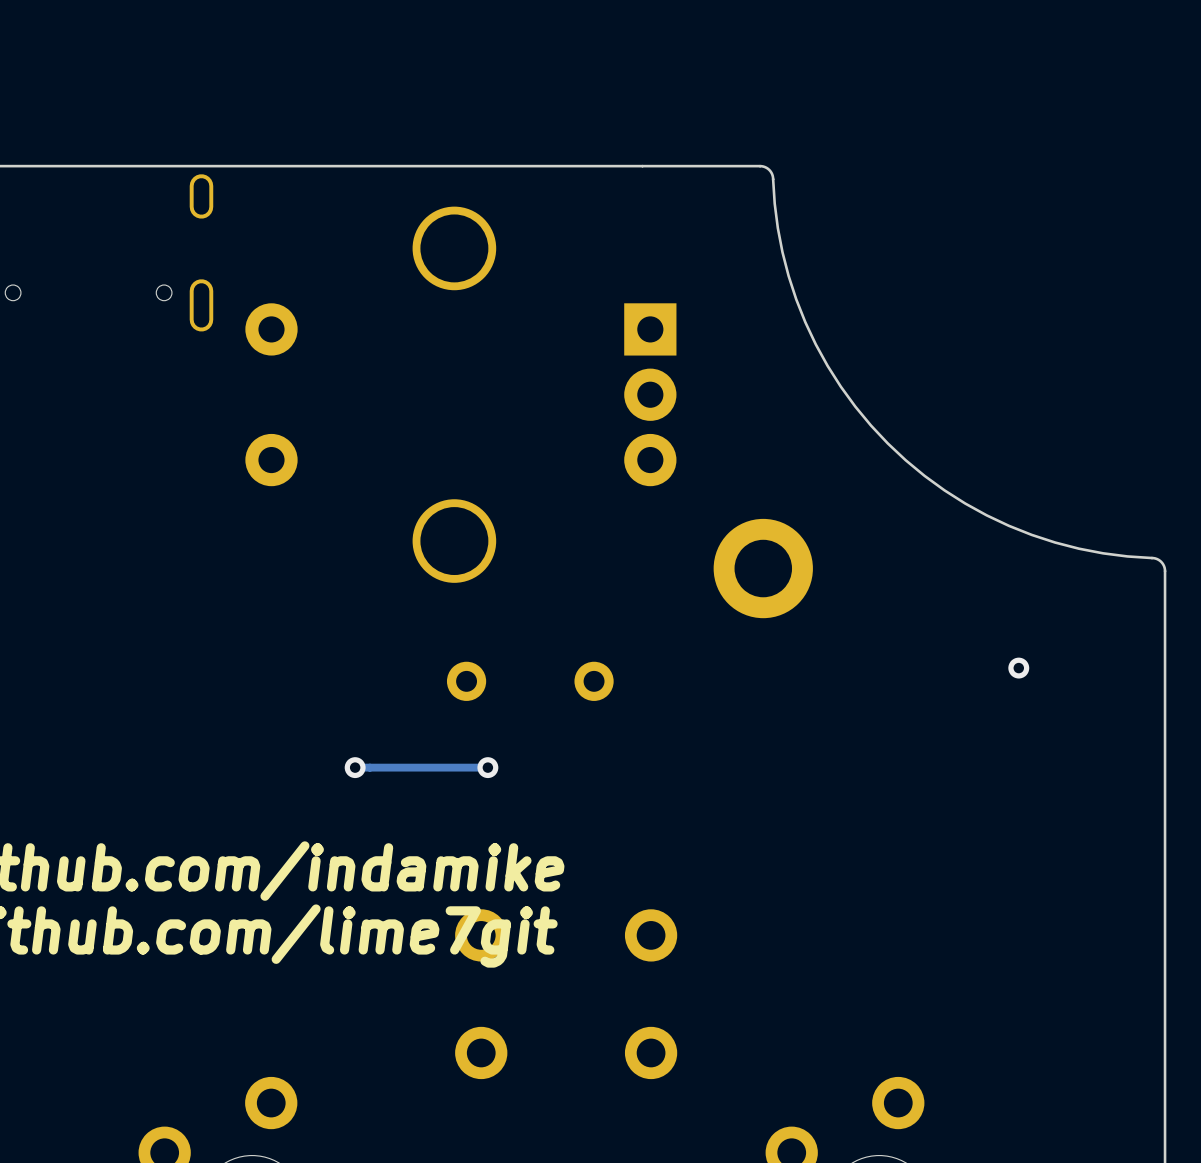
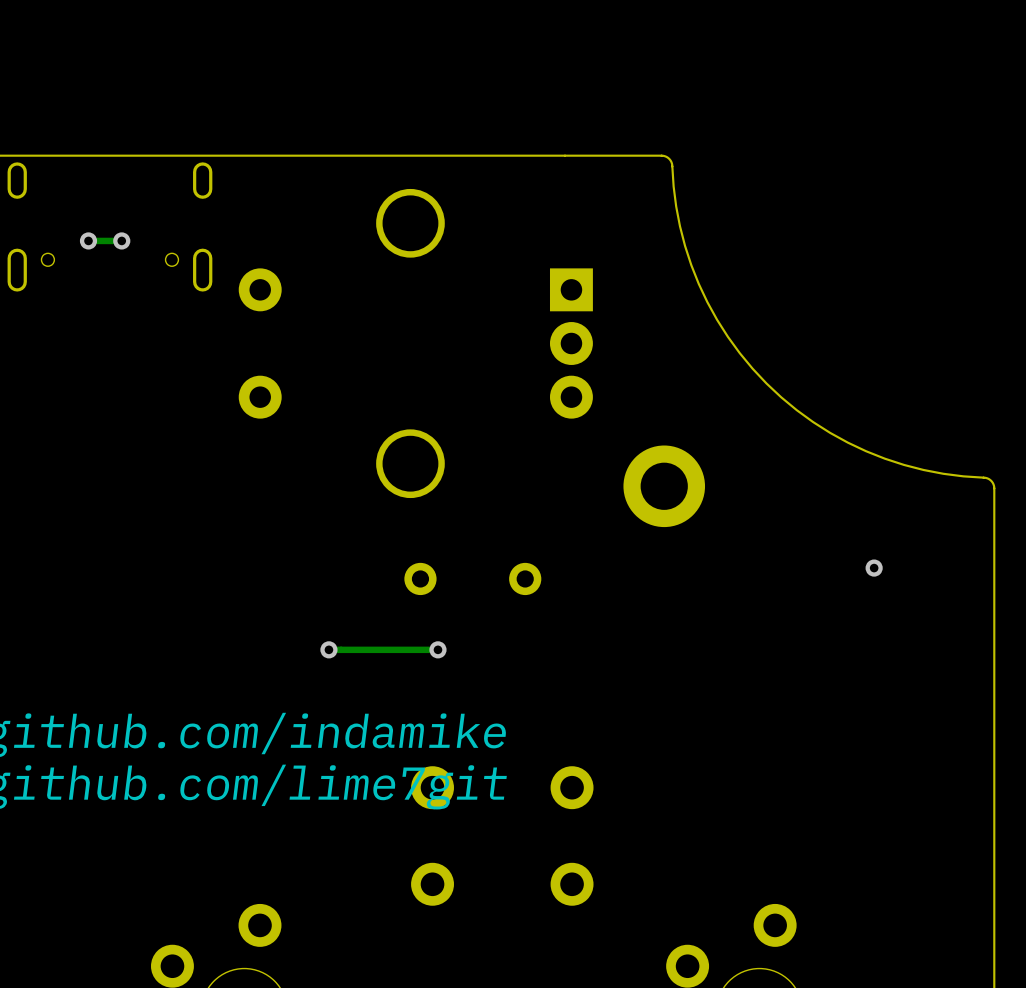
via: none -> (88, 240)
track: none -> (121, 240) (88, 240)
via: none -> (121, 240)

